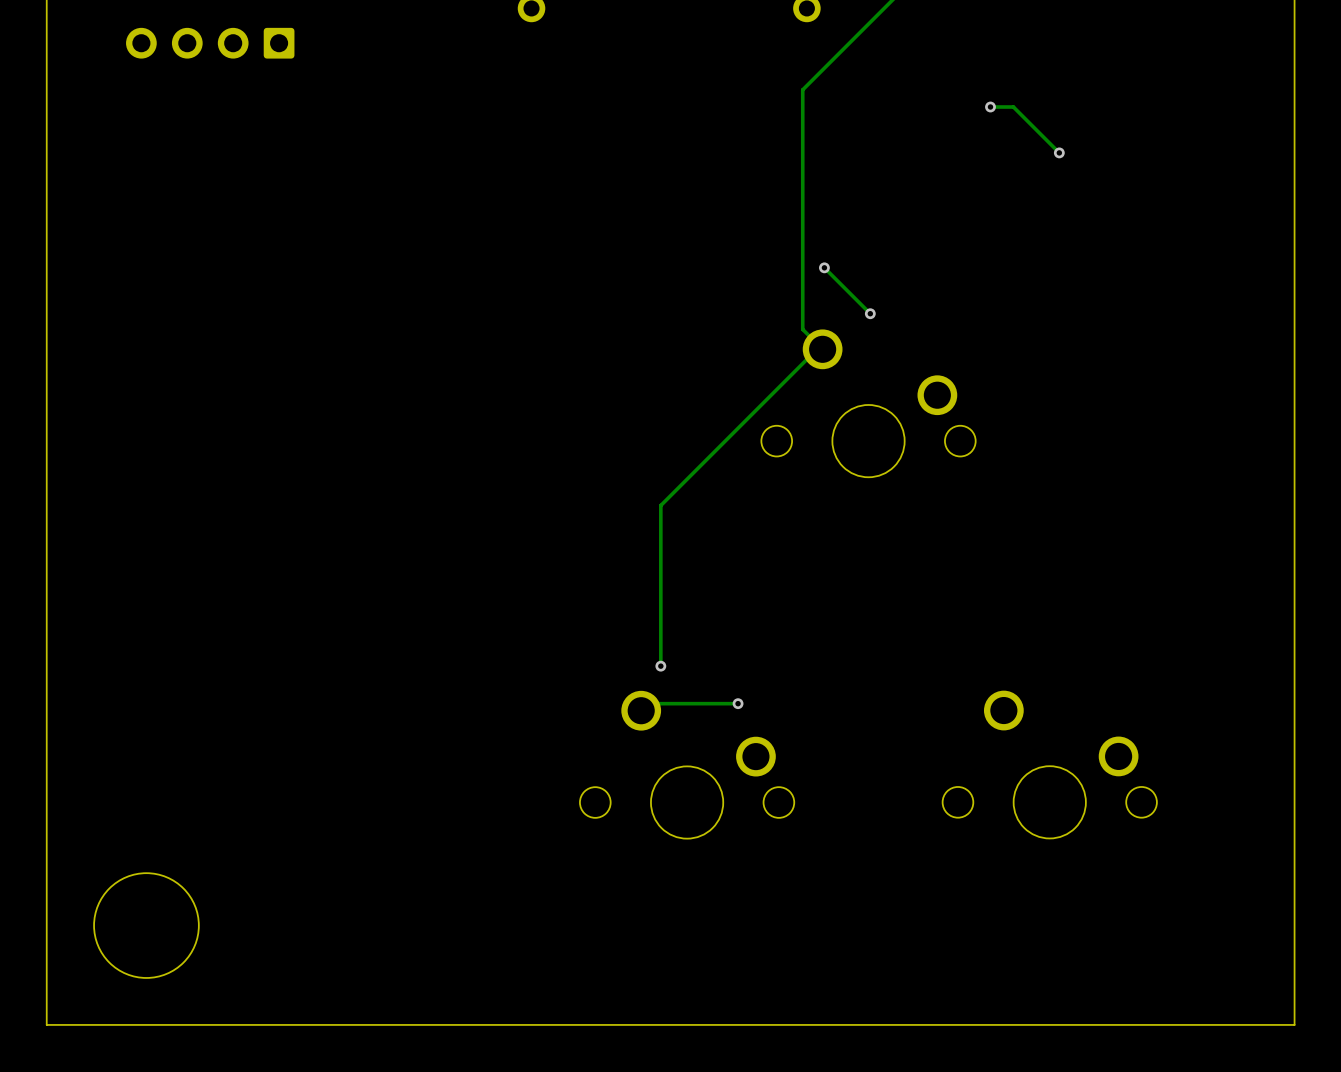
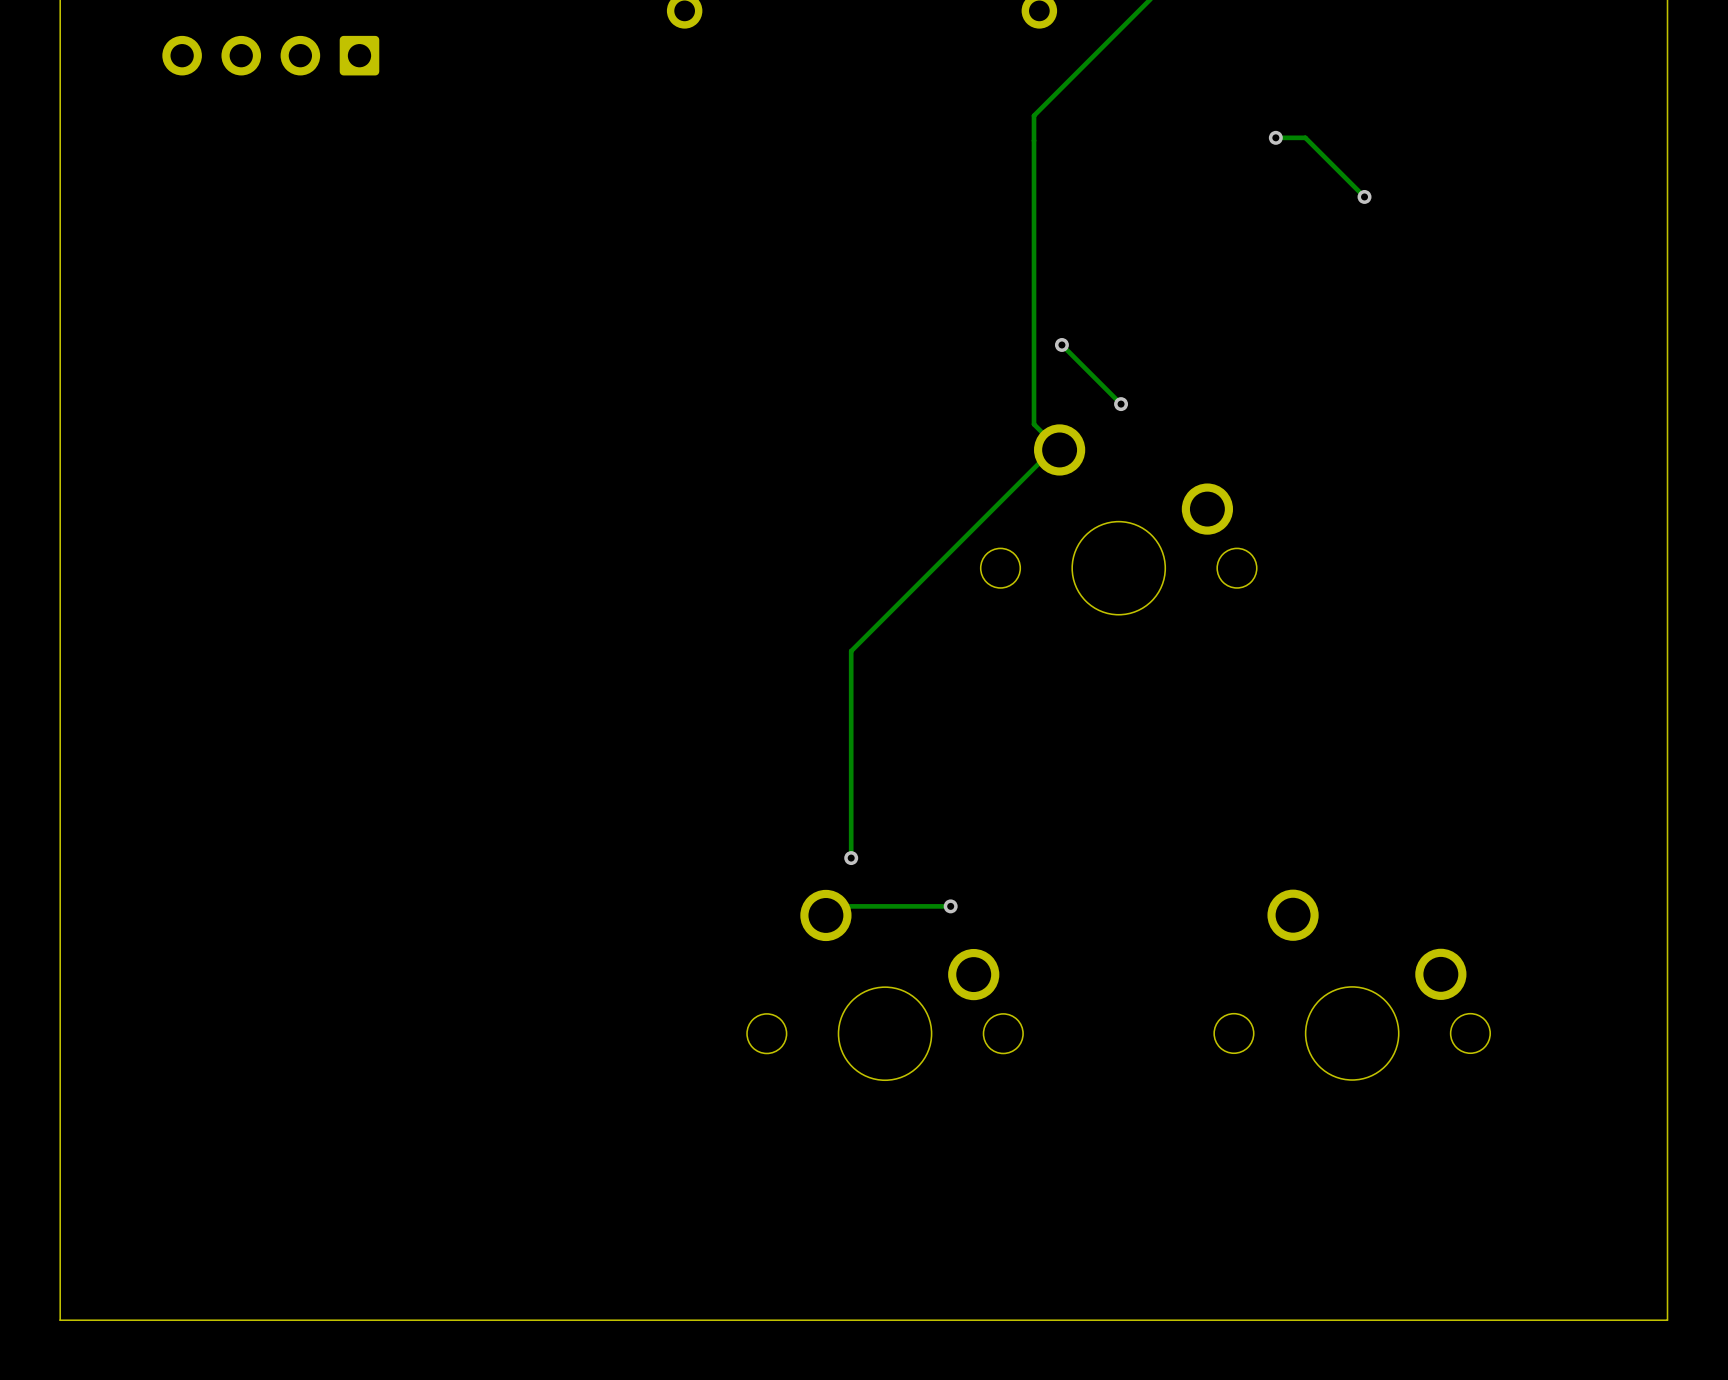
round board edge: [93, 872, 200, 979] -> none

